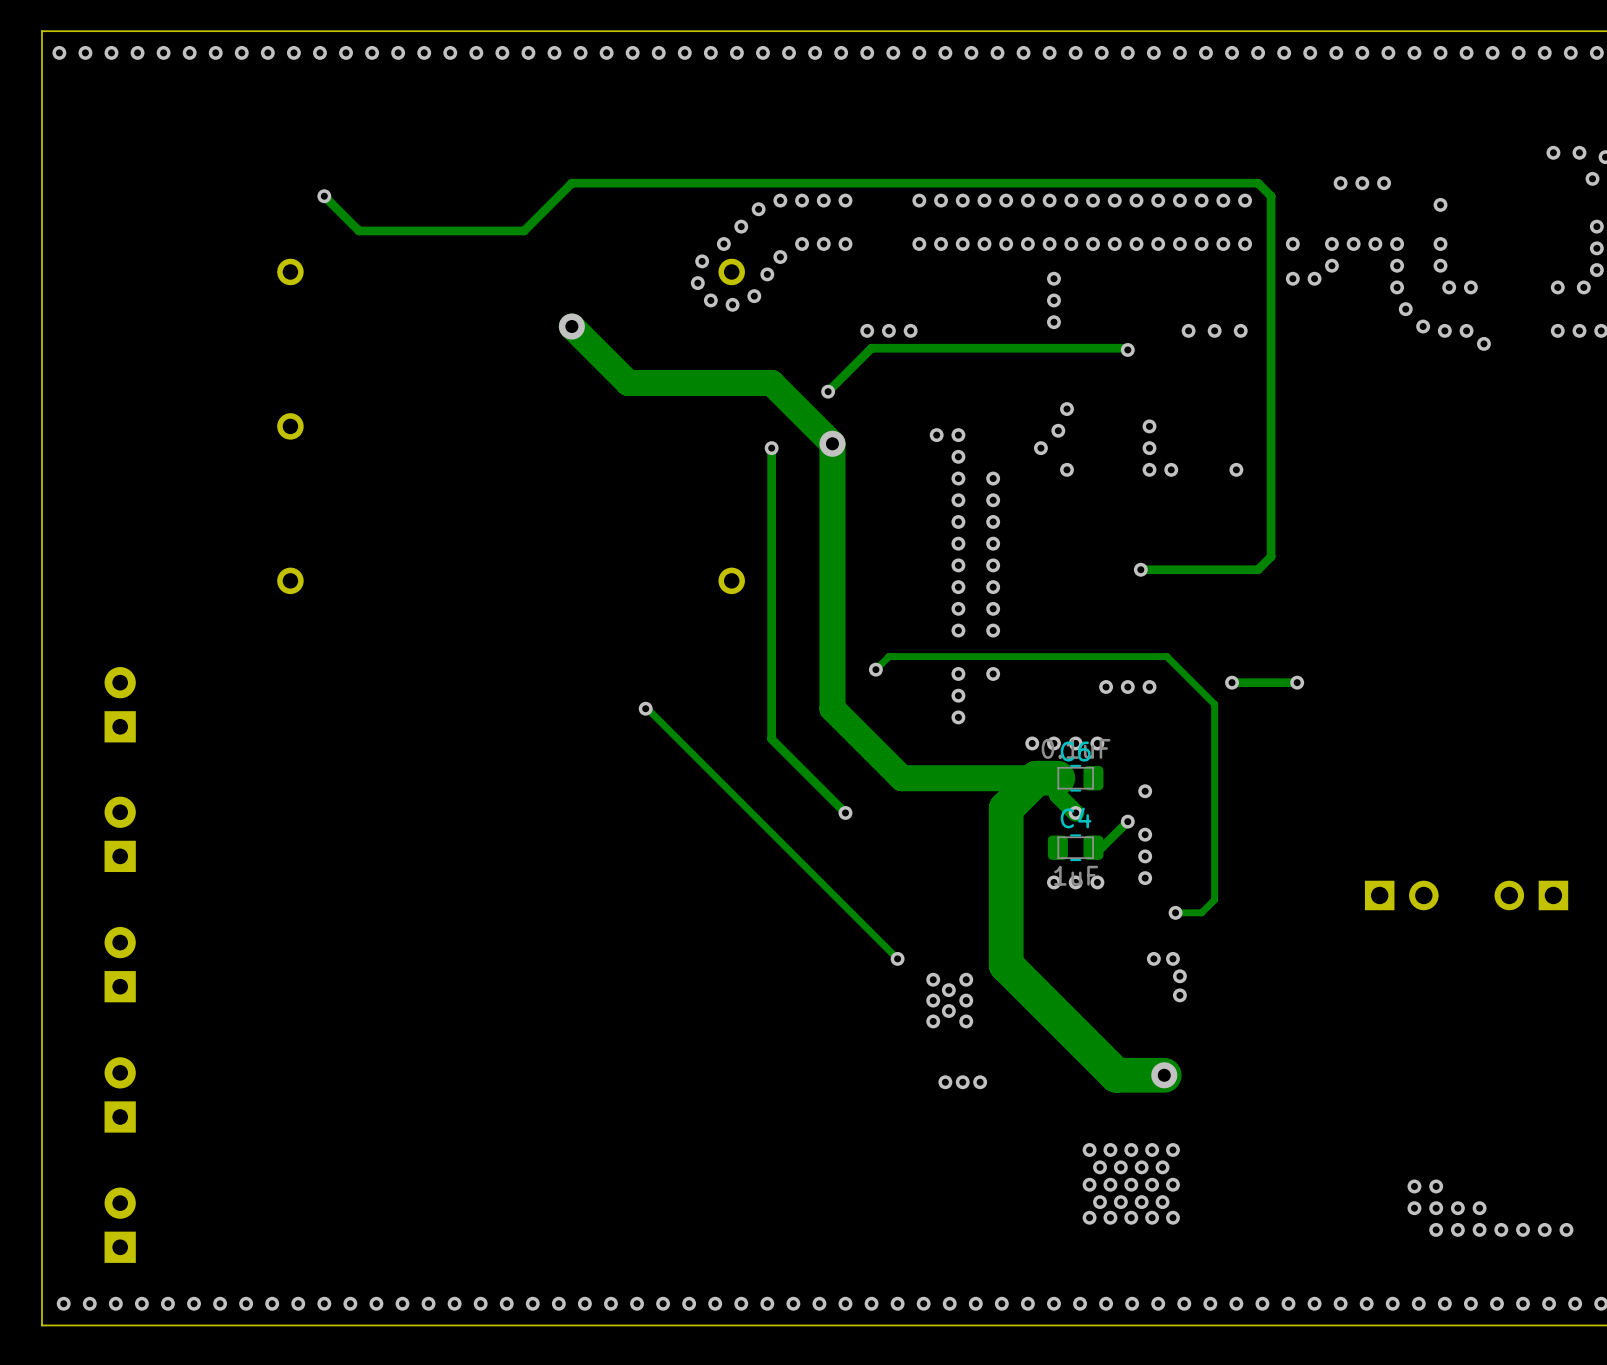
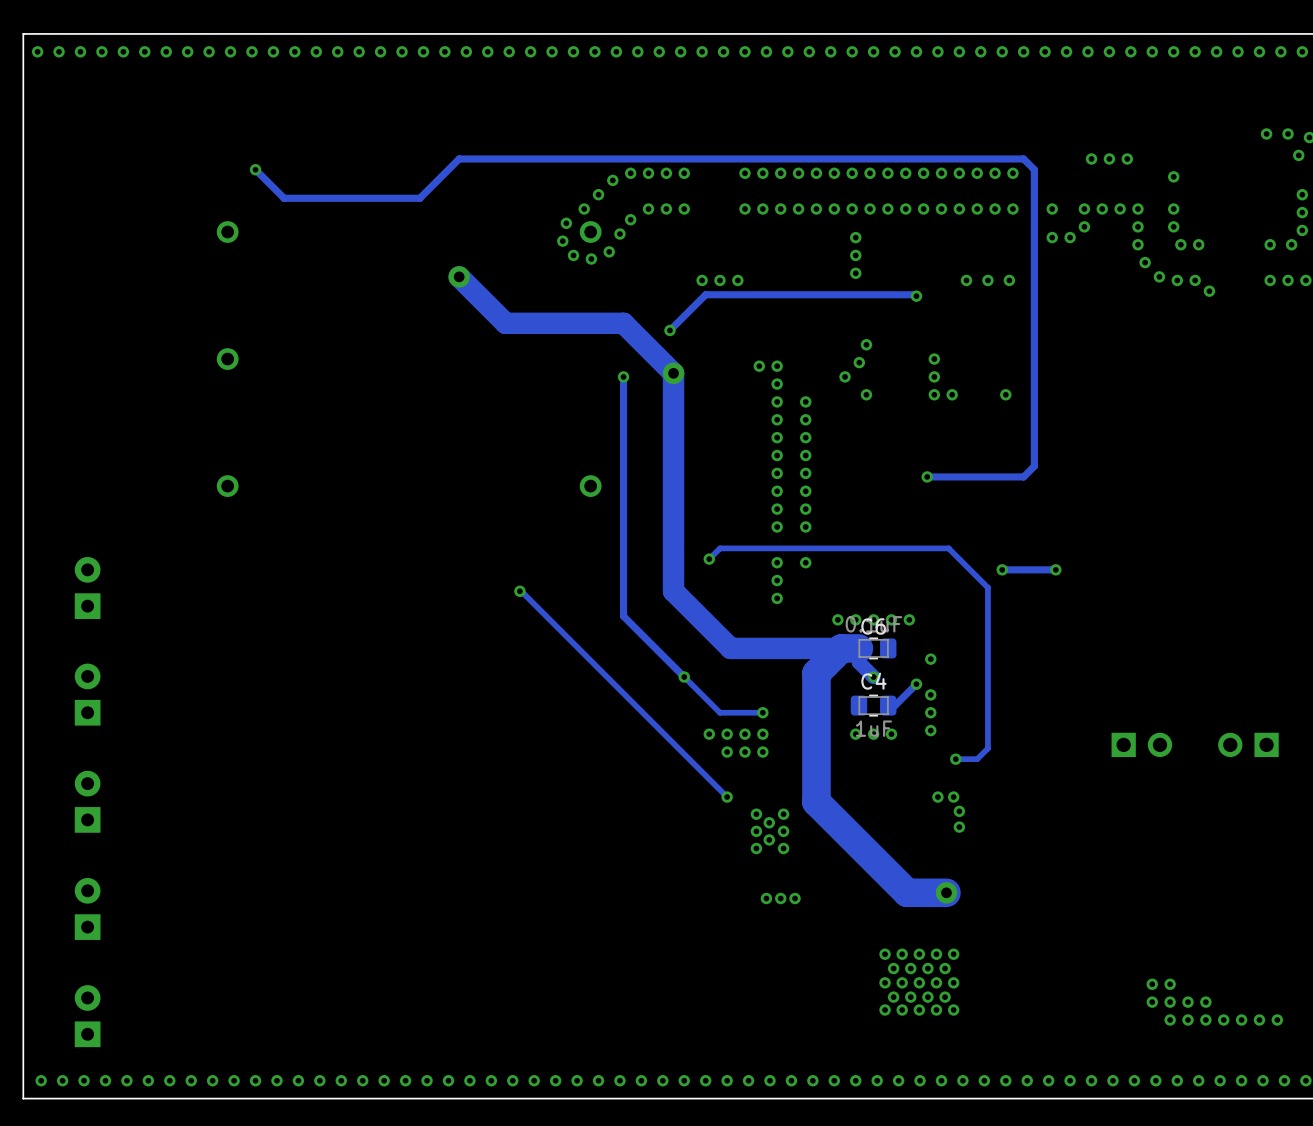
via: (1106, 687) -> none
via: (1127, 687) -> none
via: (1149, 687) -> none
via: none -> (909, 619)
track: none -> (684, 677) (719, 712) (762, 712)
via: none -> (762, 712)
via: none -> (709, 734)
via: none -> (727, 734)
via: none -> (744, 734)
via: none -> (762, 734)
via: none -> (727, 752)
via: none -> (744, 752)
via: none -> (762, 752)

